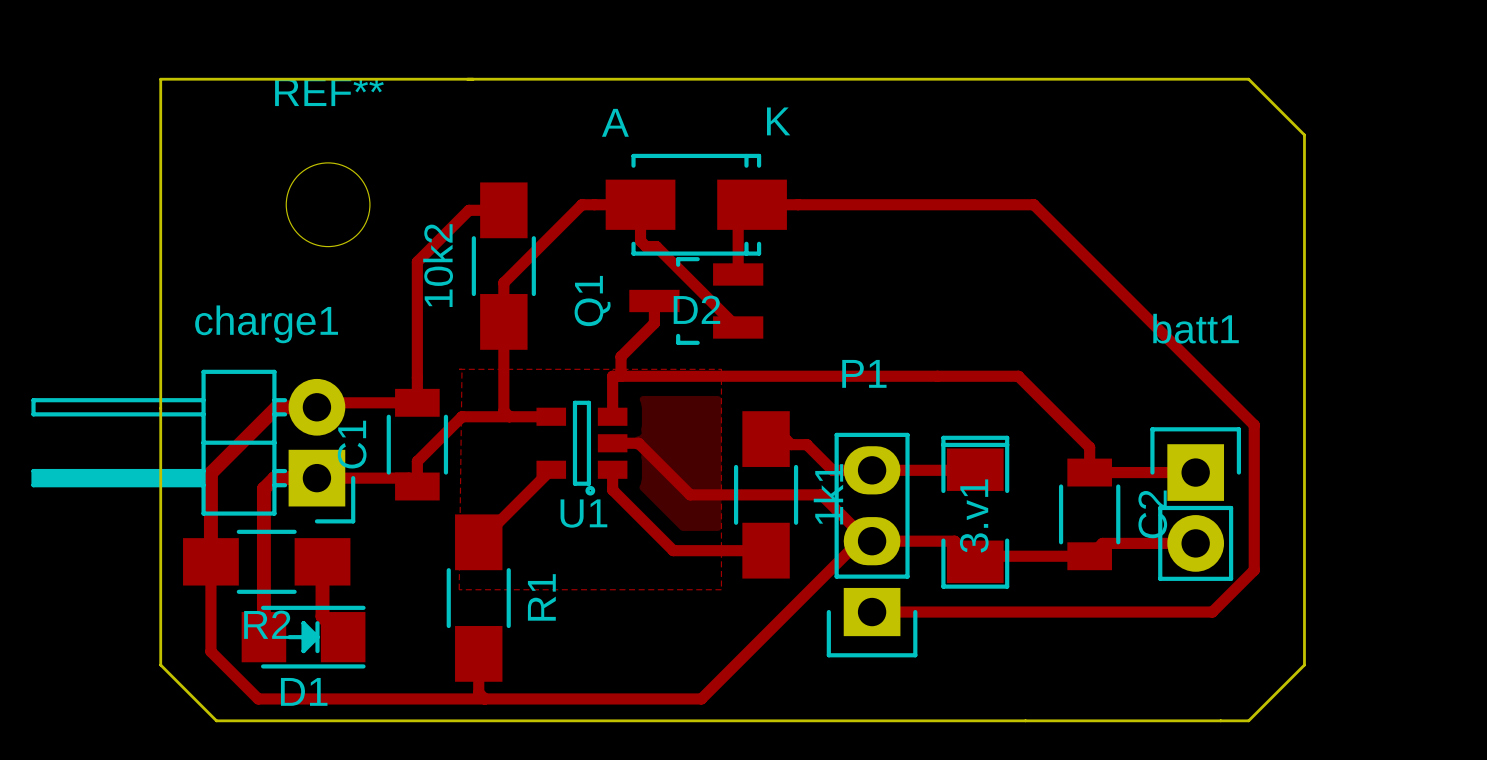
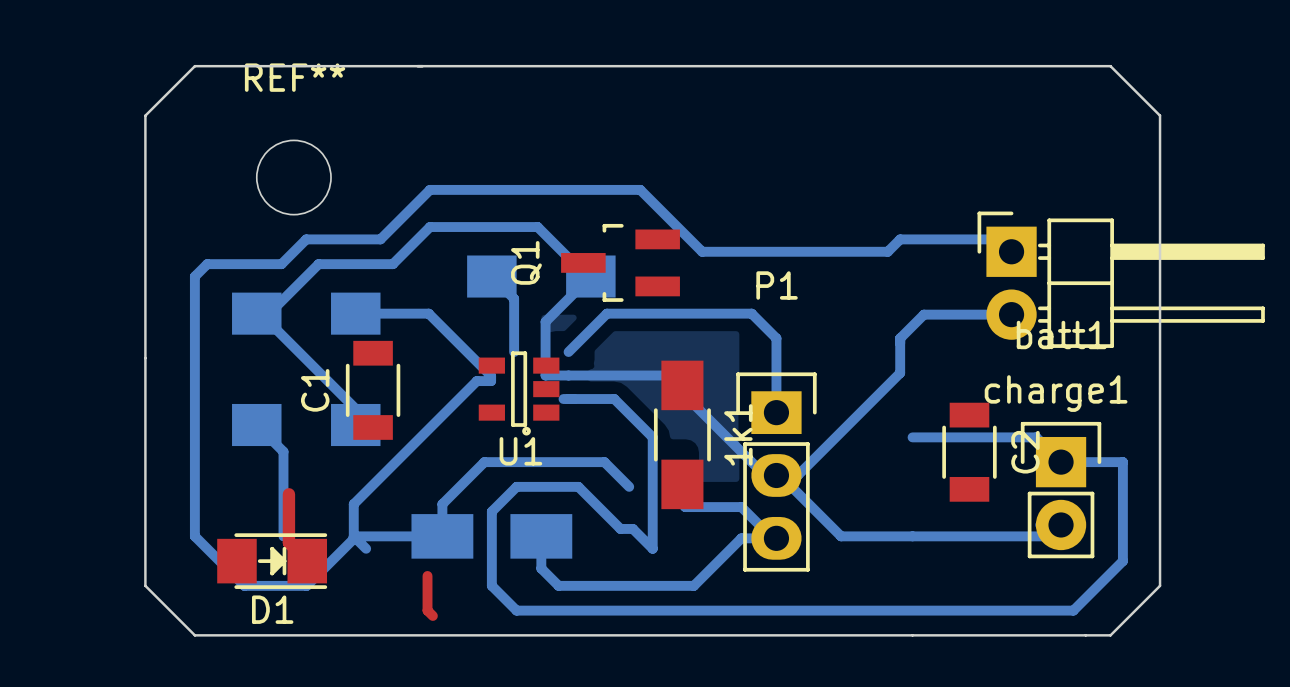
board edge: (216, 79) (160, 79) (160, 135) -> (194, 66) (145, 115)
top track: (640, 204) (640, 241) (646, 246) (656, 246) (737, 327) -> none
top track: (650, 204) (581, 204) (503, 282) (503, 411) (509, 416) -> none
D2 side: top (696, 204) -> bottom (491, 536)
top track: (503, 210) (468, 210) (417, 261) (417, 402) -> none
top track: (738, 218) (738, 274) -> none
top track: (735, 221) (752, 204) (1033, 204) (1254, 425) (1254, 570) (1212, 612) (872, 612) -> none
10k2 side: top (503, 266) -> bottom (306, 313)
bottom track: none -> (1011, 251) (999, 239) (900, 239) (887, 251) (702, 251) (640, 189) (429, 189) (380, 239) (306, 239) (281, 264) (207, 264) (194, 276) (194, 536) (244, 585) (306, 585) (353, 538) (353, 504) (476, 381) (491, 381) (491, 376) (428, 313) (355, 313)
top track: (654, 300) (654, 323) (621, 356) (621, 376) -> none
bottom track: none -> (491, 276) (514, 298) (514, 352)
bottom track: none -> (256, 313) (269, 313) (318, 264) (392, 264) (429, 227) (537, 227) (587, 276) (590, 276) (545, 321) (545, 375) (665, 375) (765, 475) (797, 475) (900, 373) (900, 338) (923, 314) (1011, 314)
bottom track: none -> (260, 313) (355, 408) (355, 425)
top zone outline: (459, 369) (721, 369) (721, 589) (459, 589) (462, 369) -> none
bottom track: none -> (568, 352) (606, 313) (751, 313) (776, 338) (776, 412)
top track: (417, 402) (321, 402) (316, 407) (276, 407) (210, 473) (210, 651) (258, 698) (701, 698) (859, 541) (954, 541) (975, 561) (980, 556) (1089, 556) (1102, 543) (1195, 543) (1180, 559) -> none
top track: (551, 416) (462, 416) (417, 461) (417, 486) (408, 478) (274, 478) (263, 488) (263, 637) -> none
top track: (612, 416) (612, 376) (1018, 376) (1089, 447) (1089, 472) (1195, 472) (1192, 475) -> none
top track: (766, 439) (785, 439) (791, 444) (806, 444) (832, 470) (975, 469) -> none
top track: (612, 443) (638, 443) (690, 494) (821, 494) (867, 541) -> none
charge1 rotation: 0° (193, 446) -> 180° (1121, 279)
charge1 position: (193, 446) -> (1121, 279)
bottom track: none -> (563, 399) (614, 399) (652, 437) (652, 548) (632, 528) (620, 528) (578, 486) (516, 486) (491, 511) (491, 585) (516, 610) (1073, 610) (1122, 561) (1122, 462) (1061, 462) (1036, 437) (912, 437)
top track: (551, 469) (478, 542) -> none
top track: (612, 469) (612, 489) (673, 550) (766, 550) -> none
bottom track: none -> (256, 425) (283, 451) (283, 536)
batt1 position: (1195, 504) -> (1061, 490)
3.v1: (975, 512) -> none
bottom track: none -> (780, 475) (841, 536) (1049, 536) (1061, 524) (1040, 524)
P1 rotation: 0° (872, 545) -> 180° (776, 472)
bottom track: none -> (629, 486) (604, 462) (484, 462) (442, 504) (442, 536) (353, 536) (366, 548)
bottom track: none -> (676, 486) (676, 498) (685, 507) (741, 507) (772, 538)
R2 side: top (266, 561) -> bottom (306, 425)
R1 side: top (478, 598) -> bottom (541, 276)
bottom track: none -> (541, 536) (541, 568) (558, 585) (693, 585) (741, 538) (780, 538)

